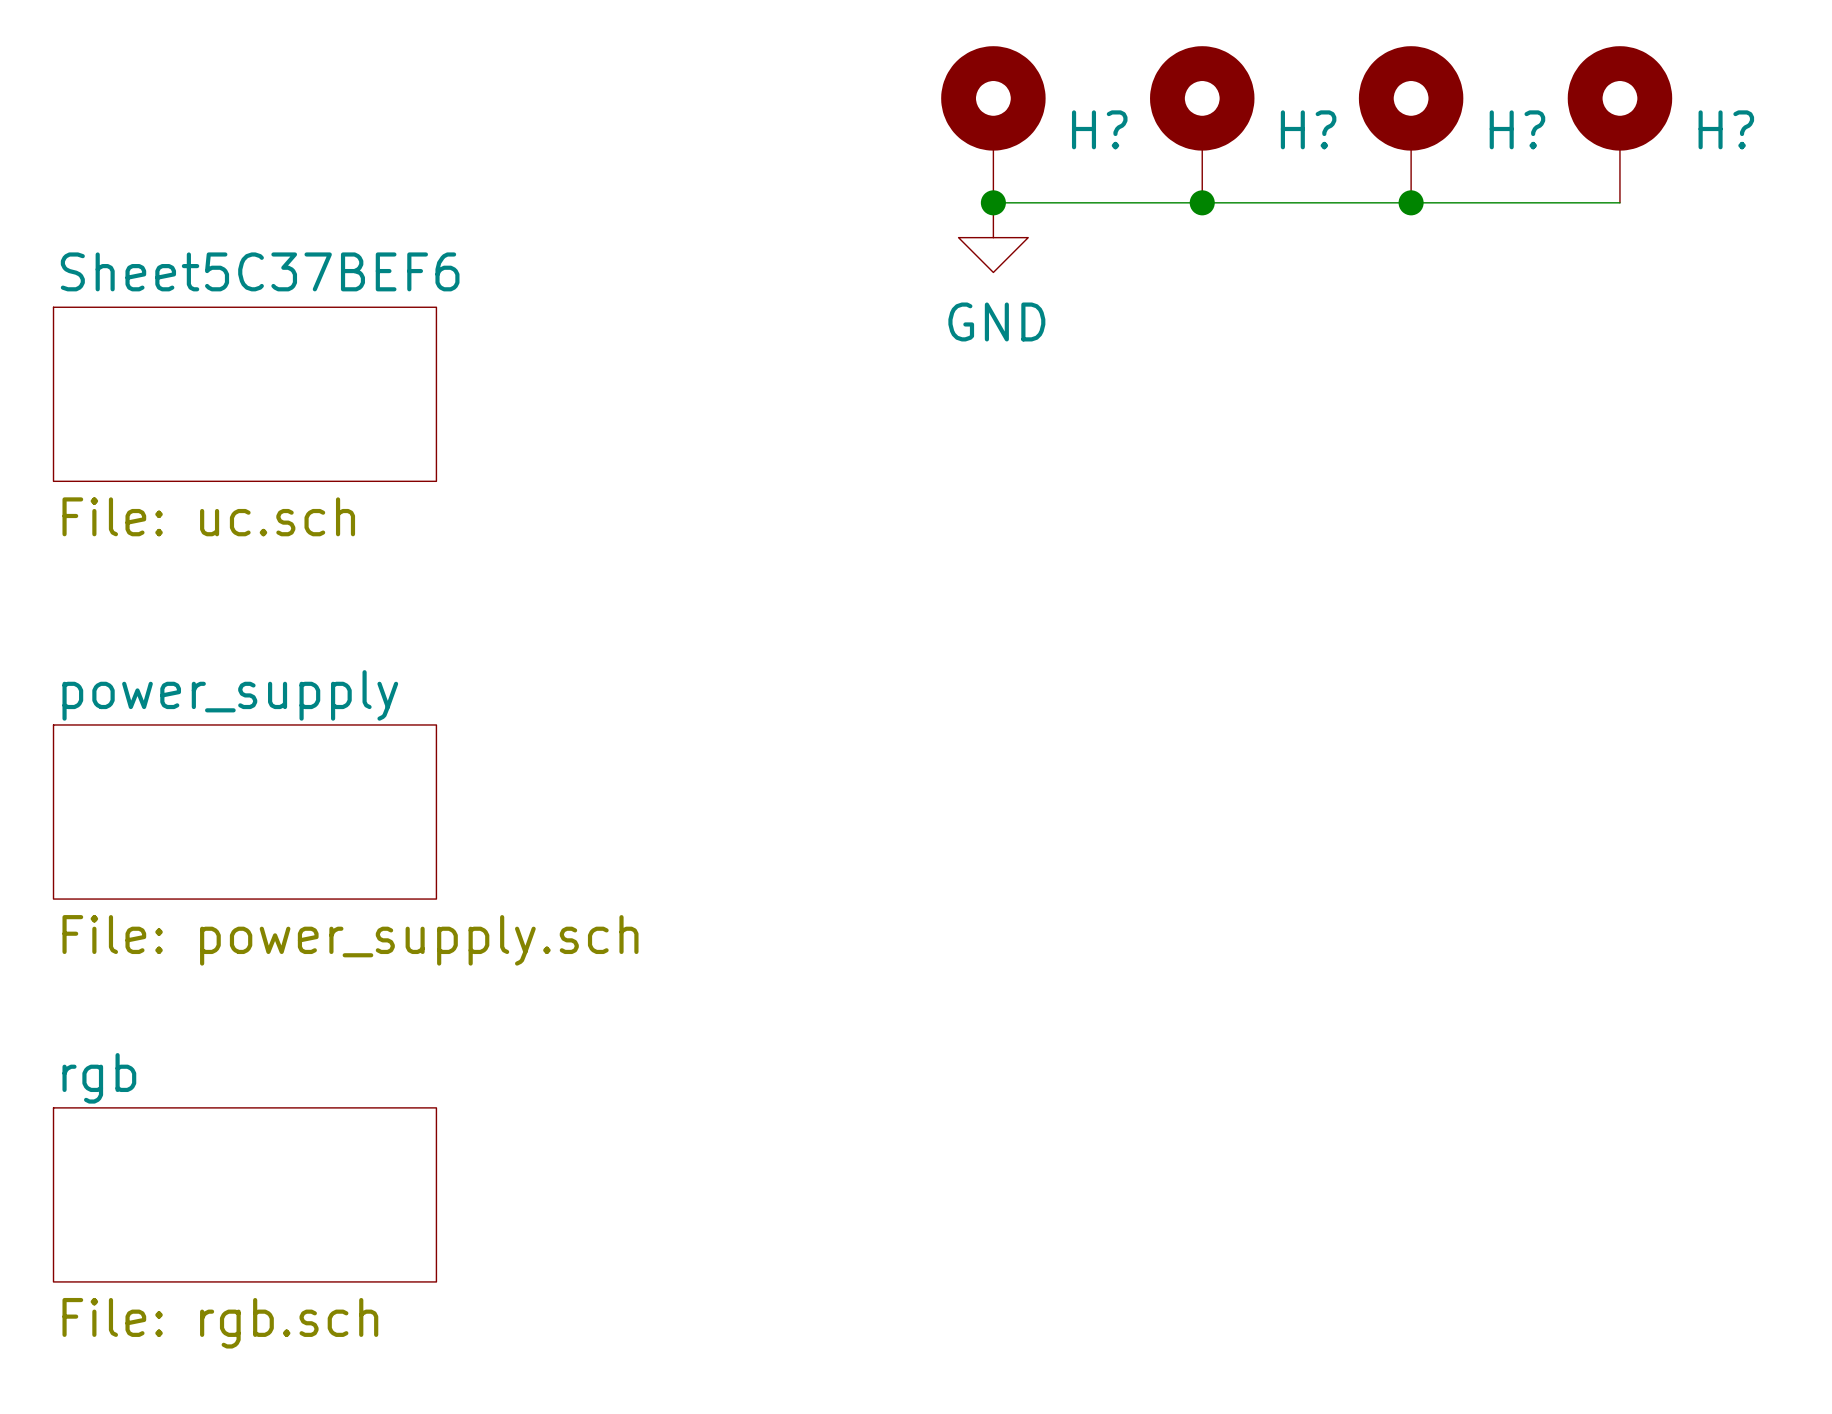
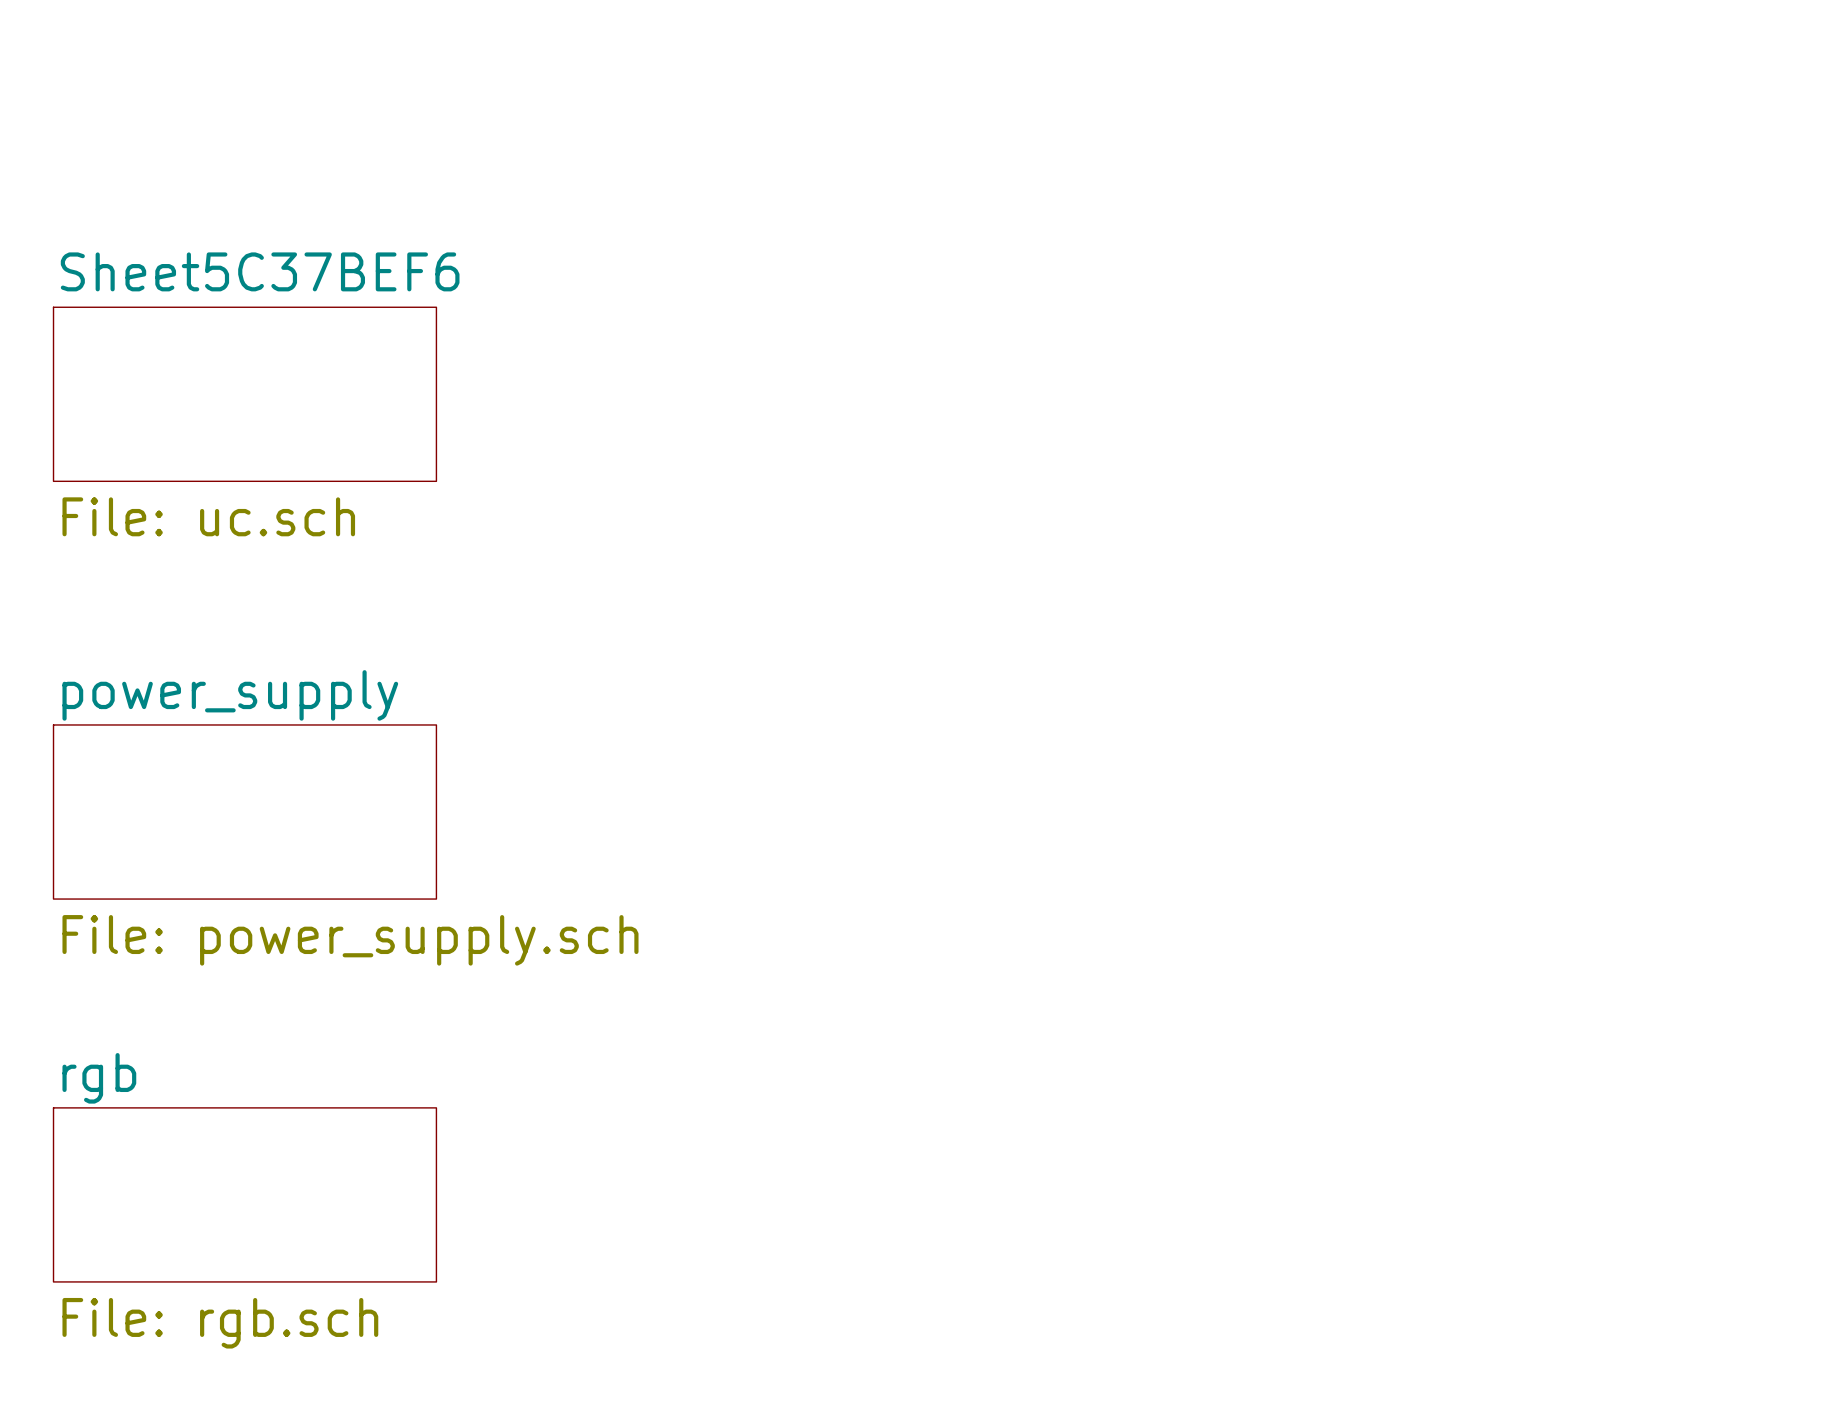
H?: (993, 124) -> none
H?: (1202, 124) -> none
H?: (1411, 124) -> none
H?: (1619, 124) -> none
wire: (993, 202) (1619, 202) -> none
junction: (993, 202) -> none
junction: (1202, 202) -> none
junction: (1411, 202) -> none
power symbol: GND (993, 237) -> none

